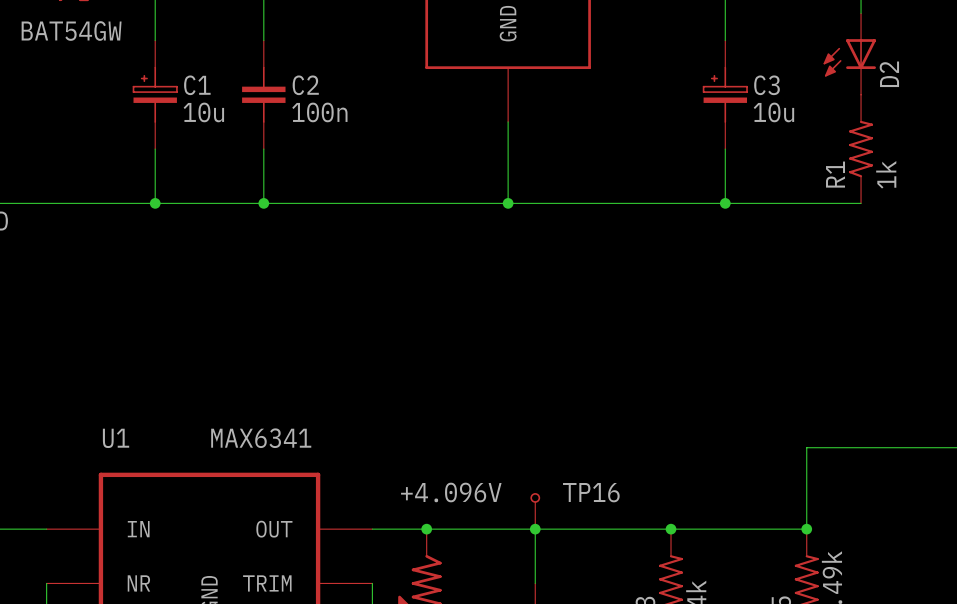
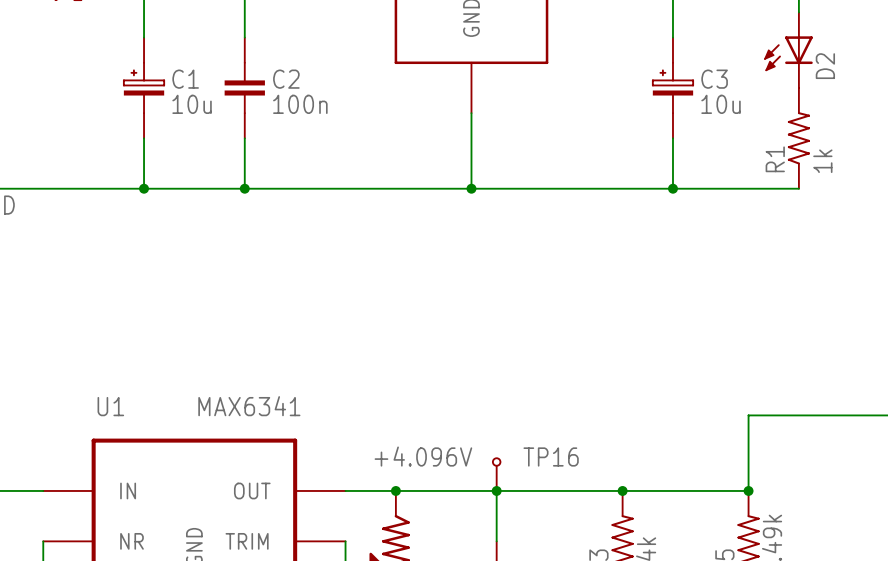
part value: BAT54GW (71, 31) -> none

